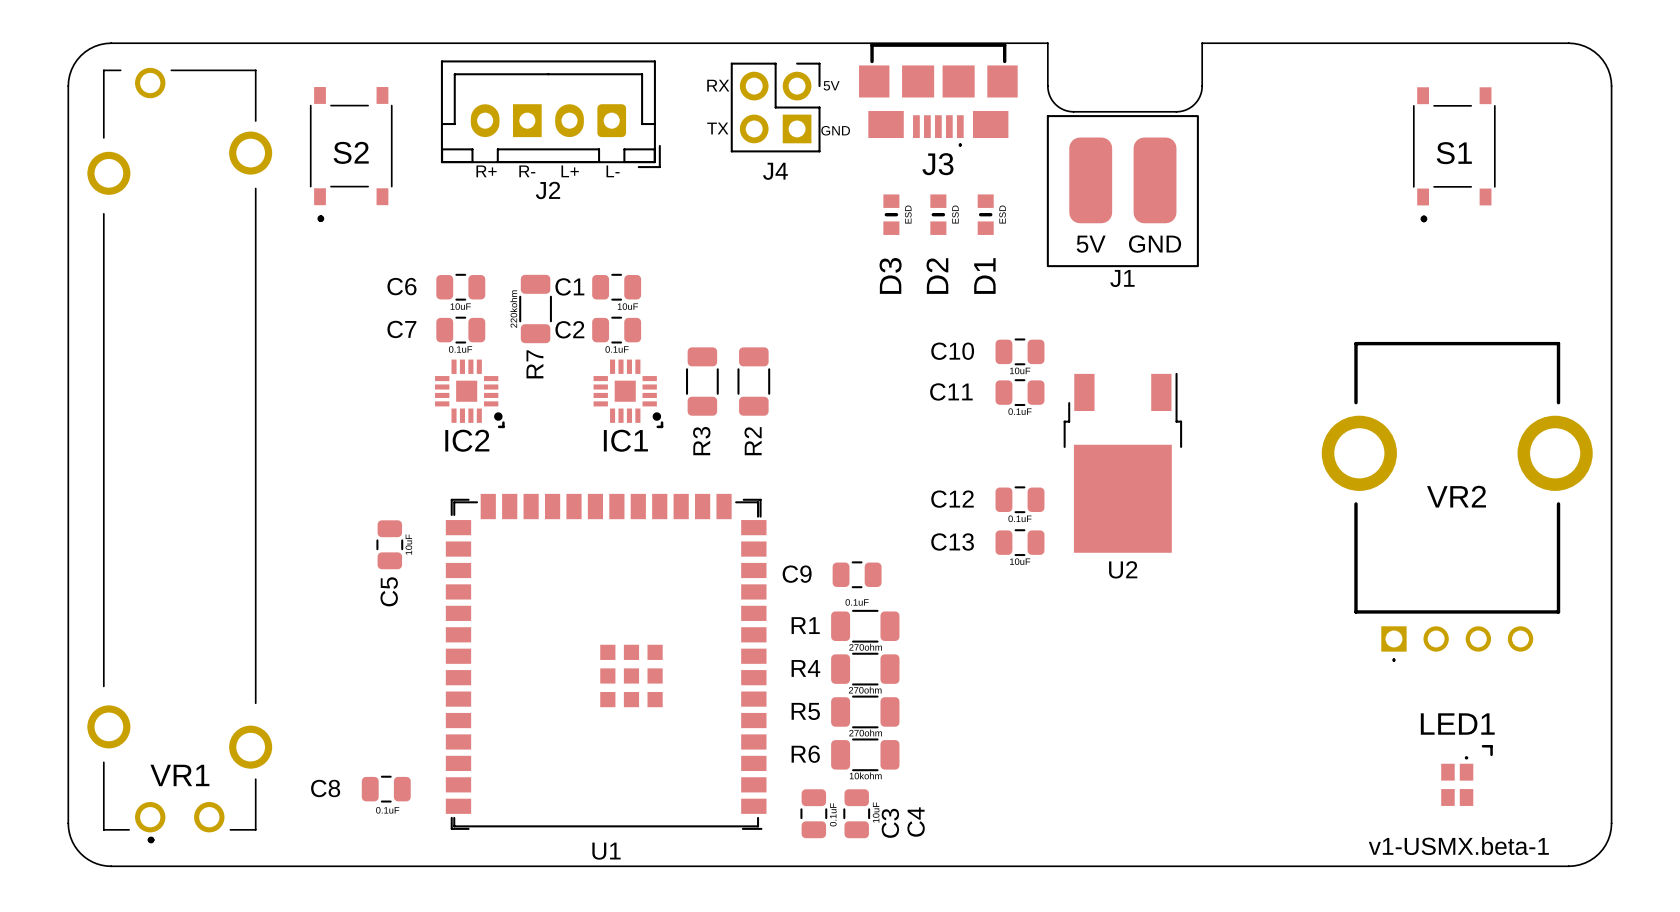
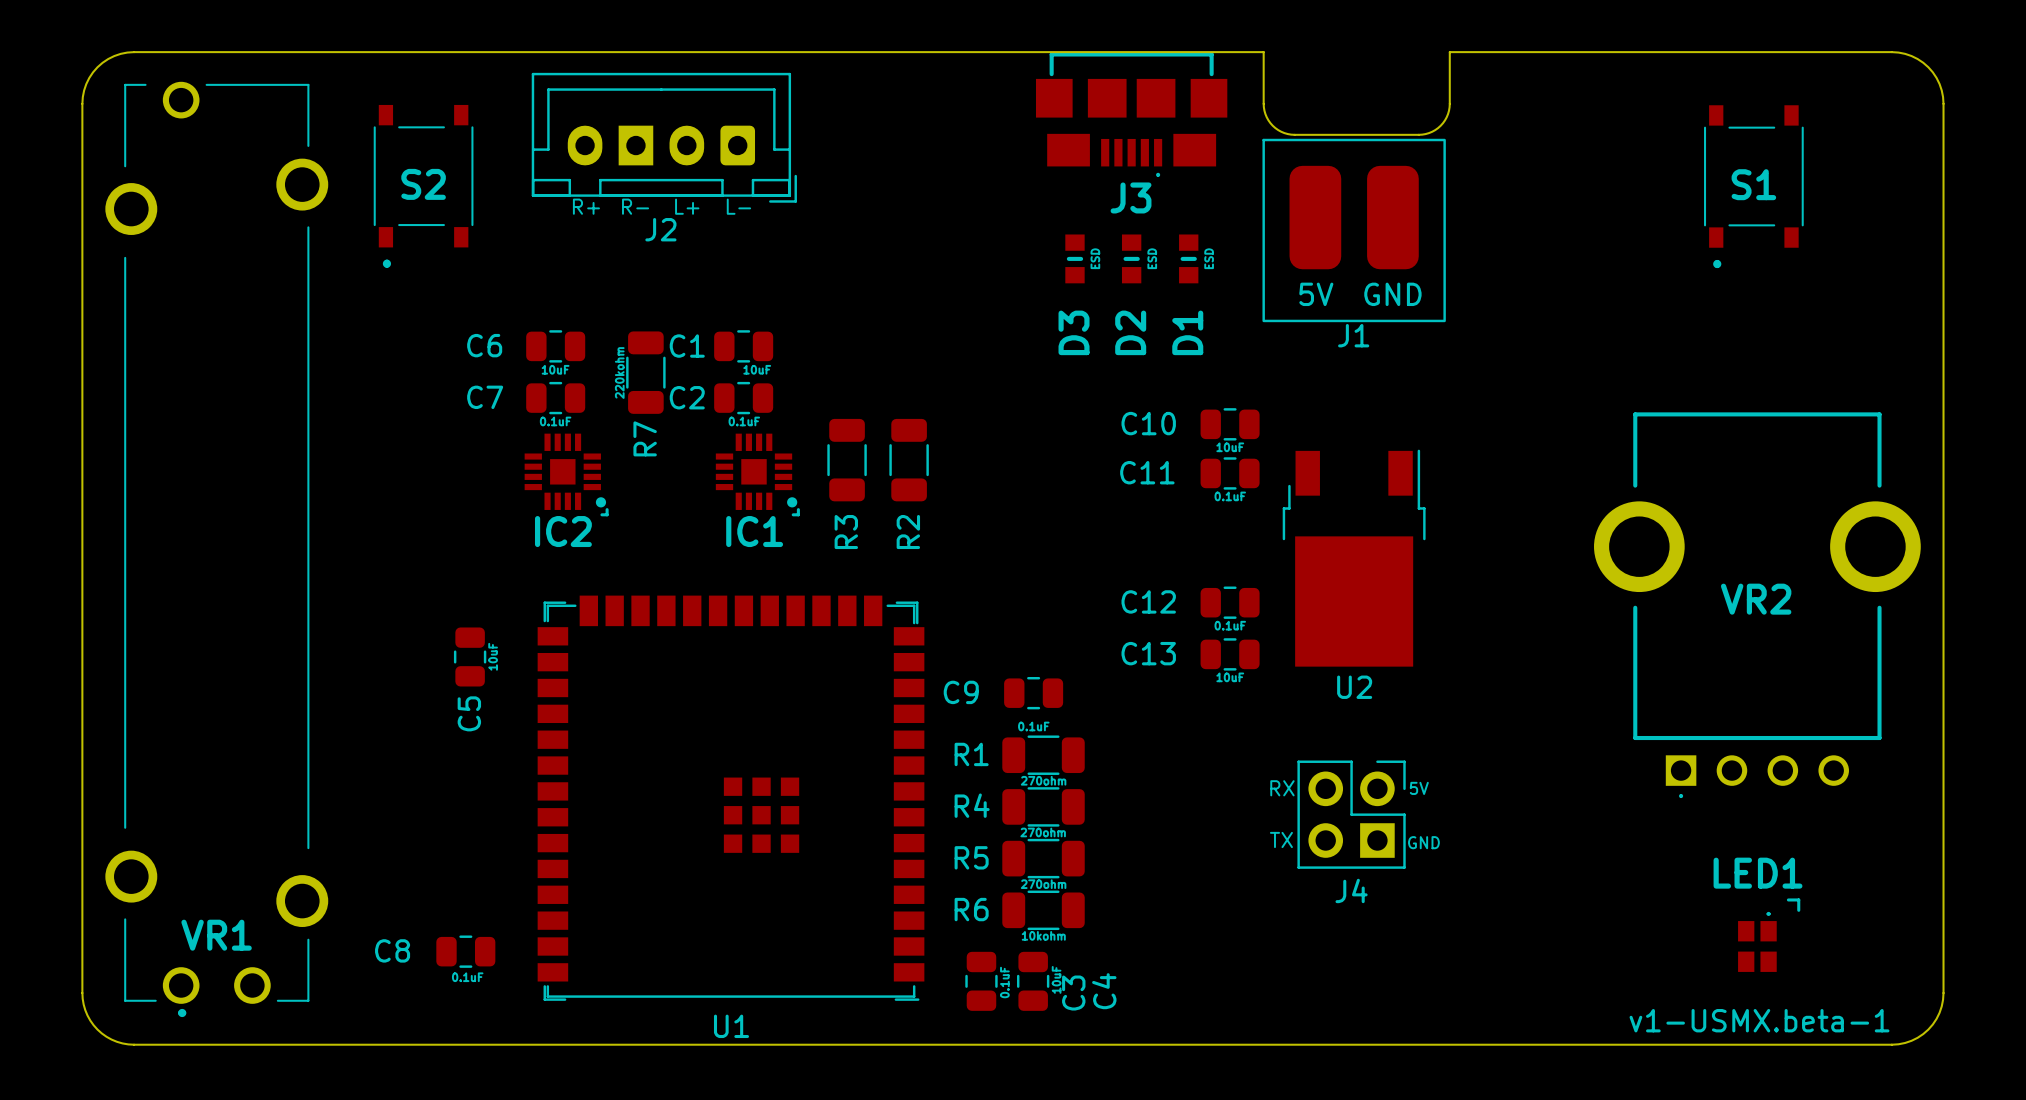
text: RX (718, 85) -> none
text: 5V (831, 85) -> none
J4 position: (775, 107) -> (1351, 814)
text: TX (717, 128) -> none
text: GND (835, 130) -> none
text: none -> RX (1282, 788)
text: none -> 5V (1419, 788)
text: none -> TX (1281, 839)
text: none -> GND (1423, 842)

